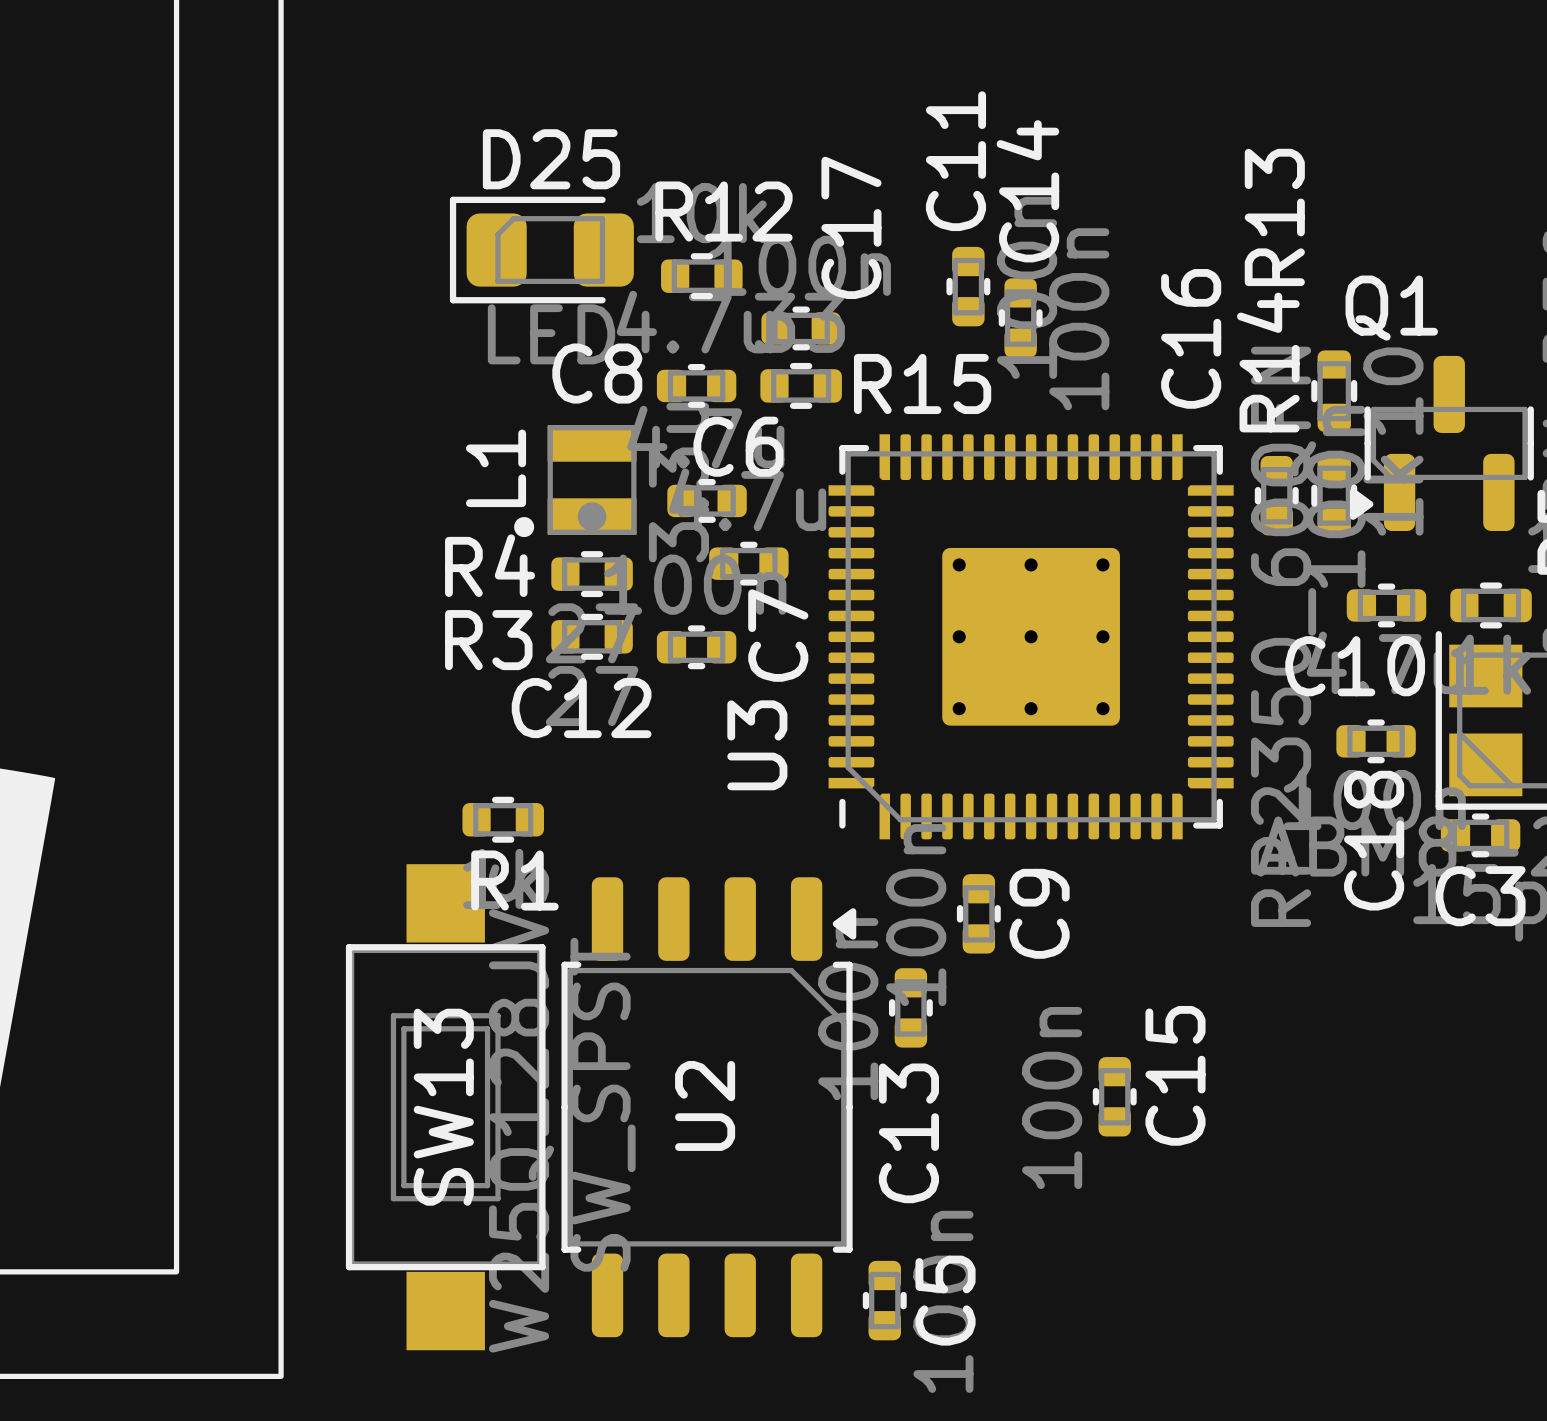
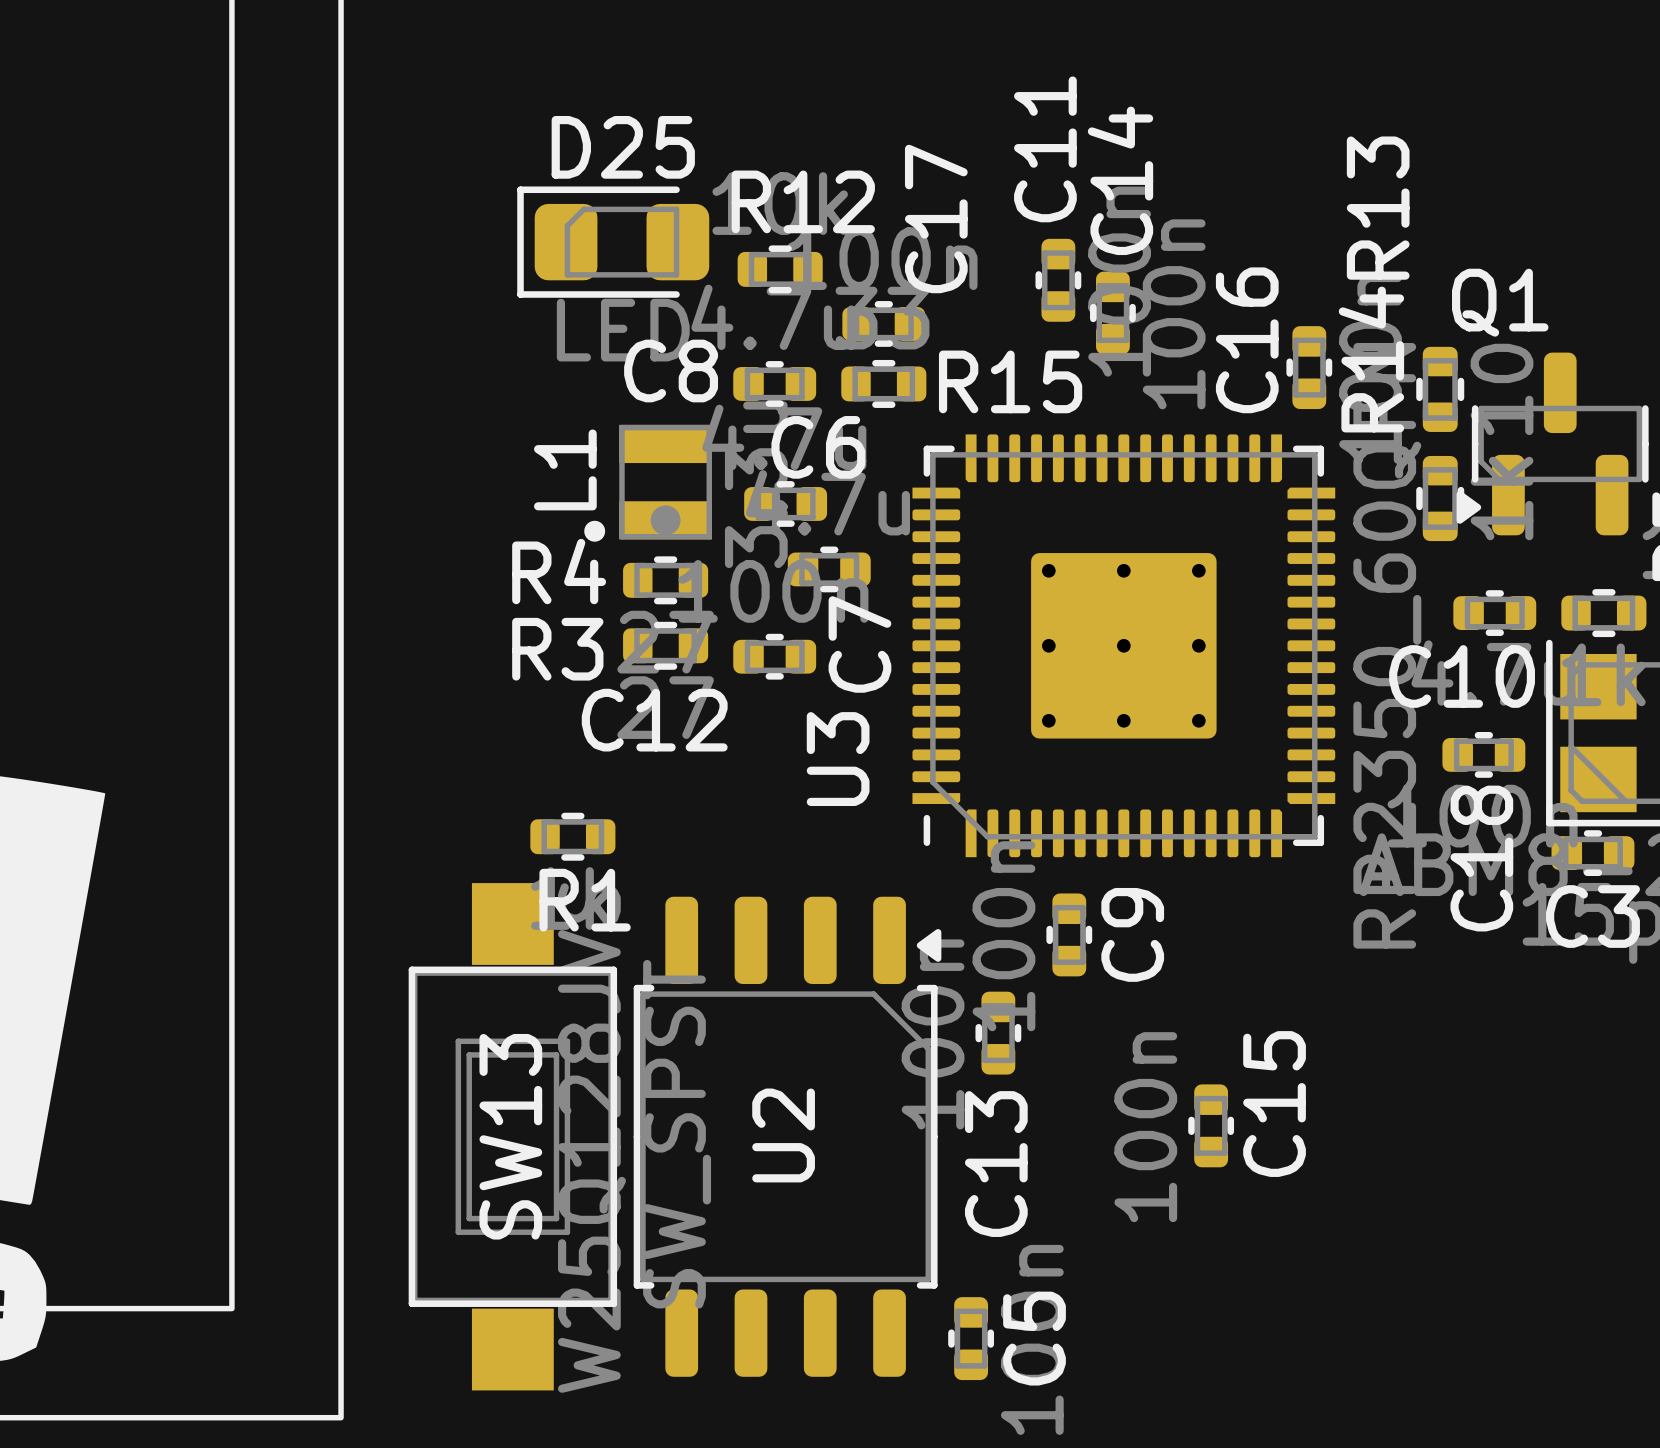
C16 name position: C16 (1191, 338) -> C16 (1247, 340)
C16 position: (1276, 495) -> (1309, 367)

